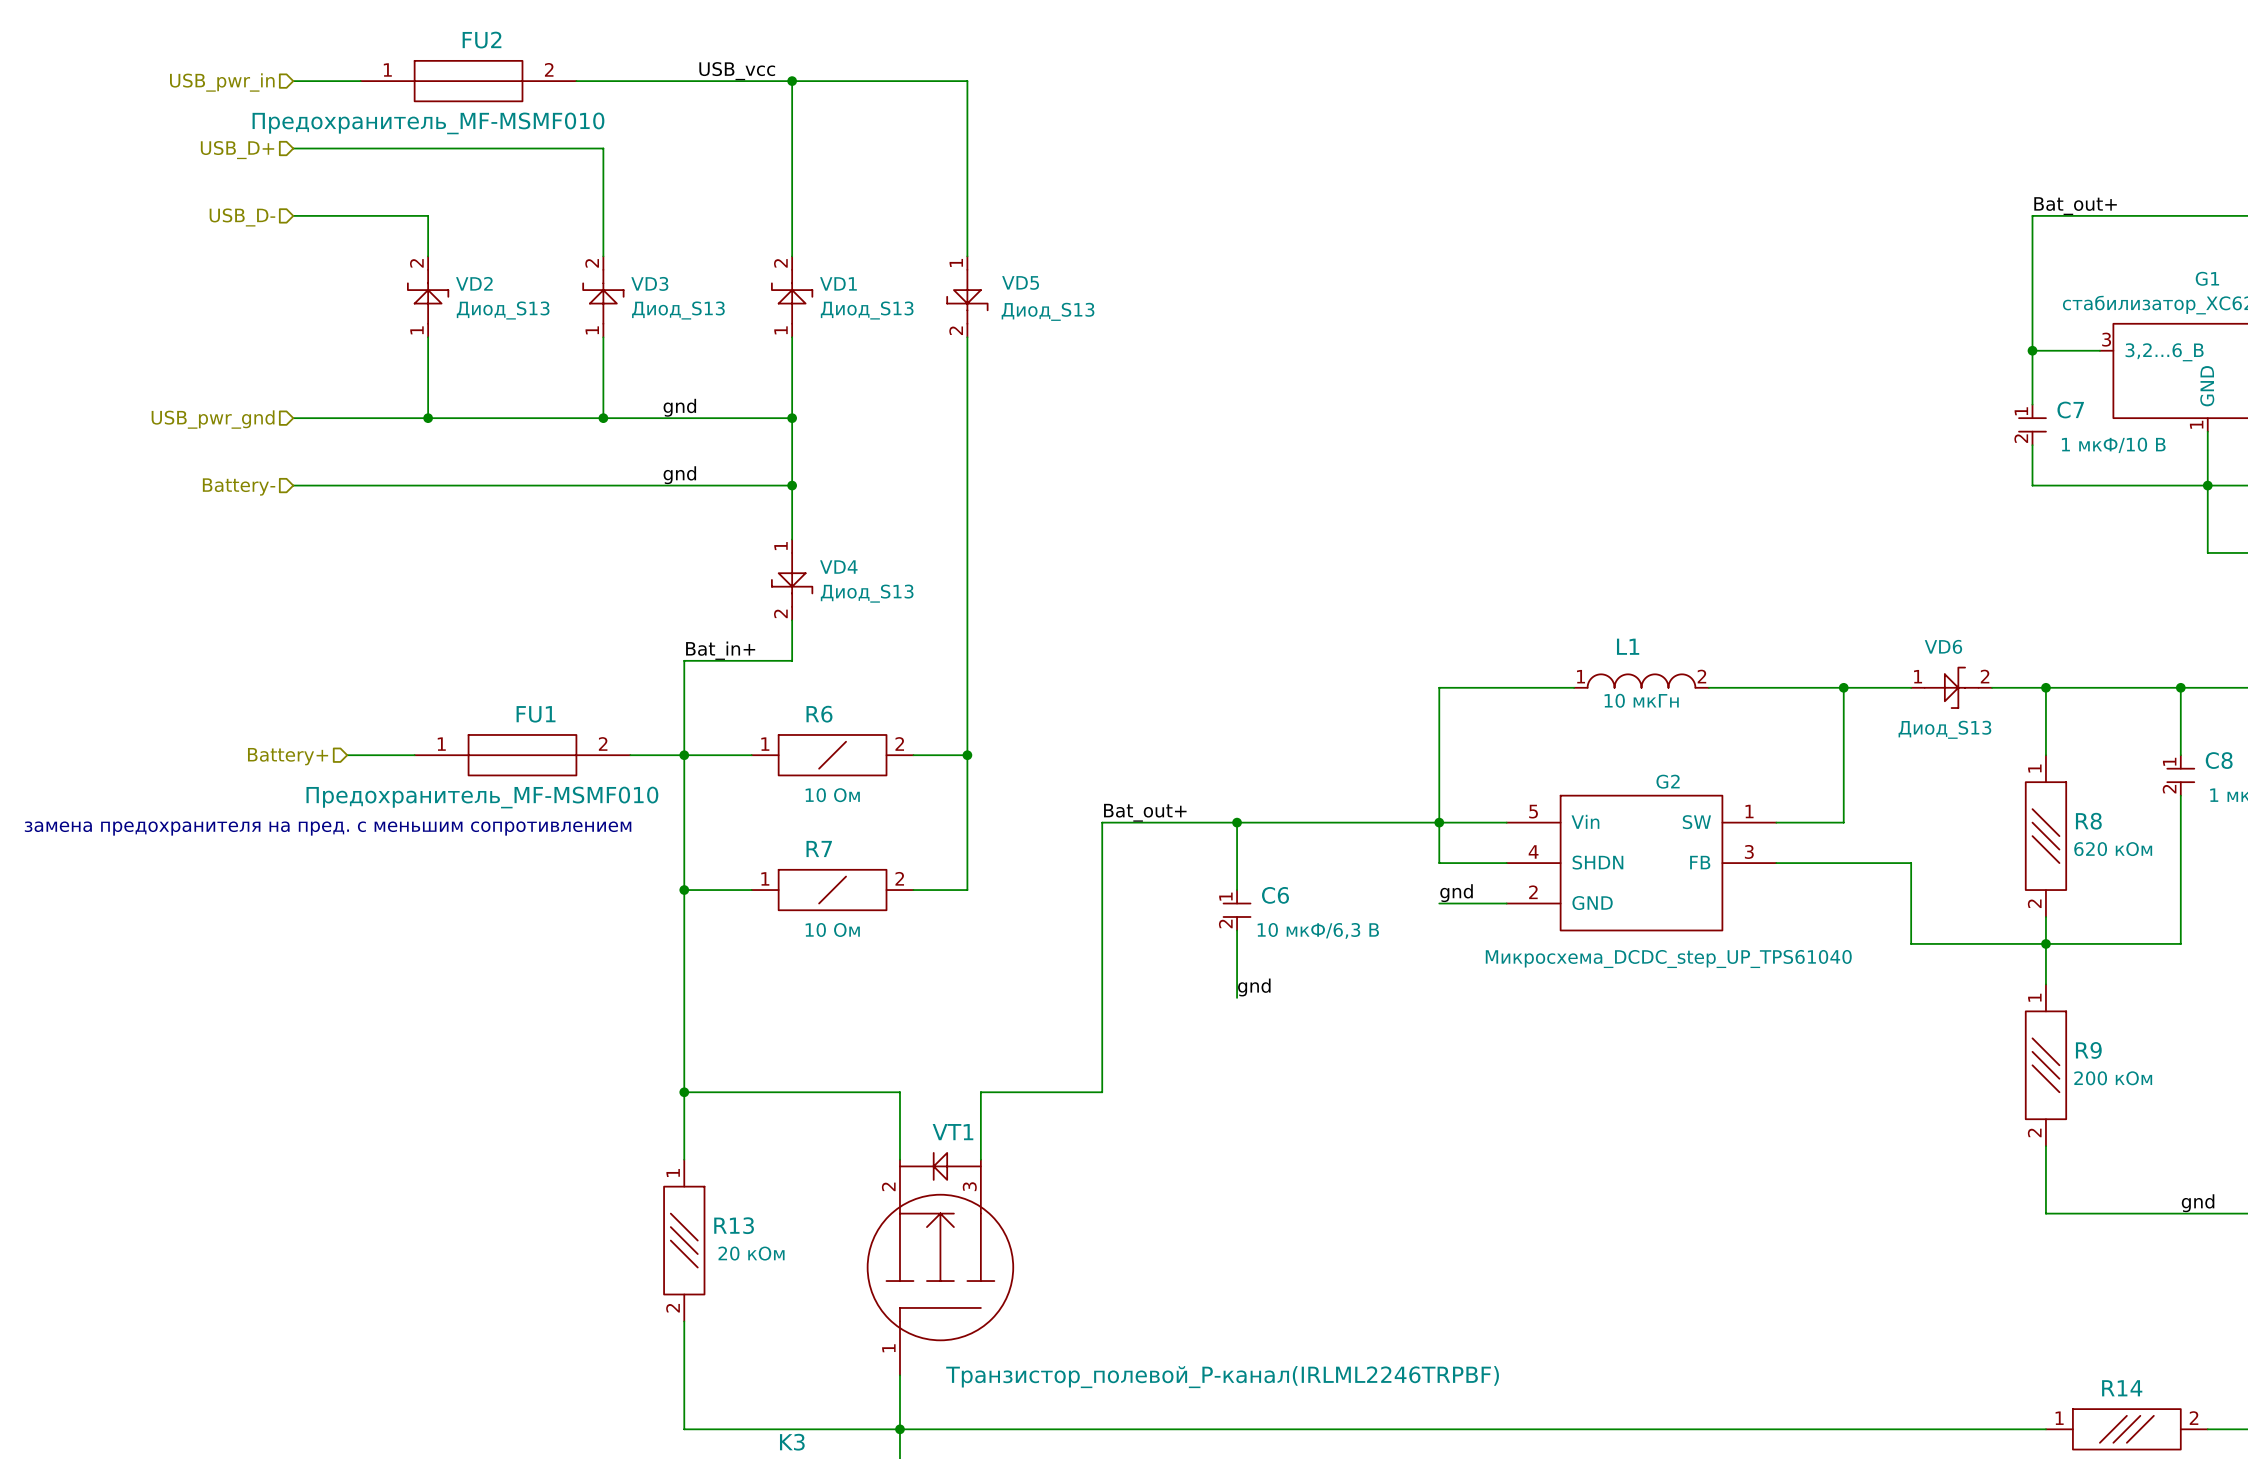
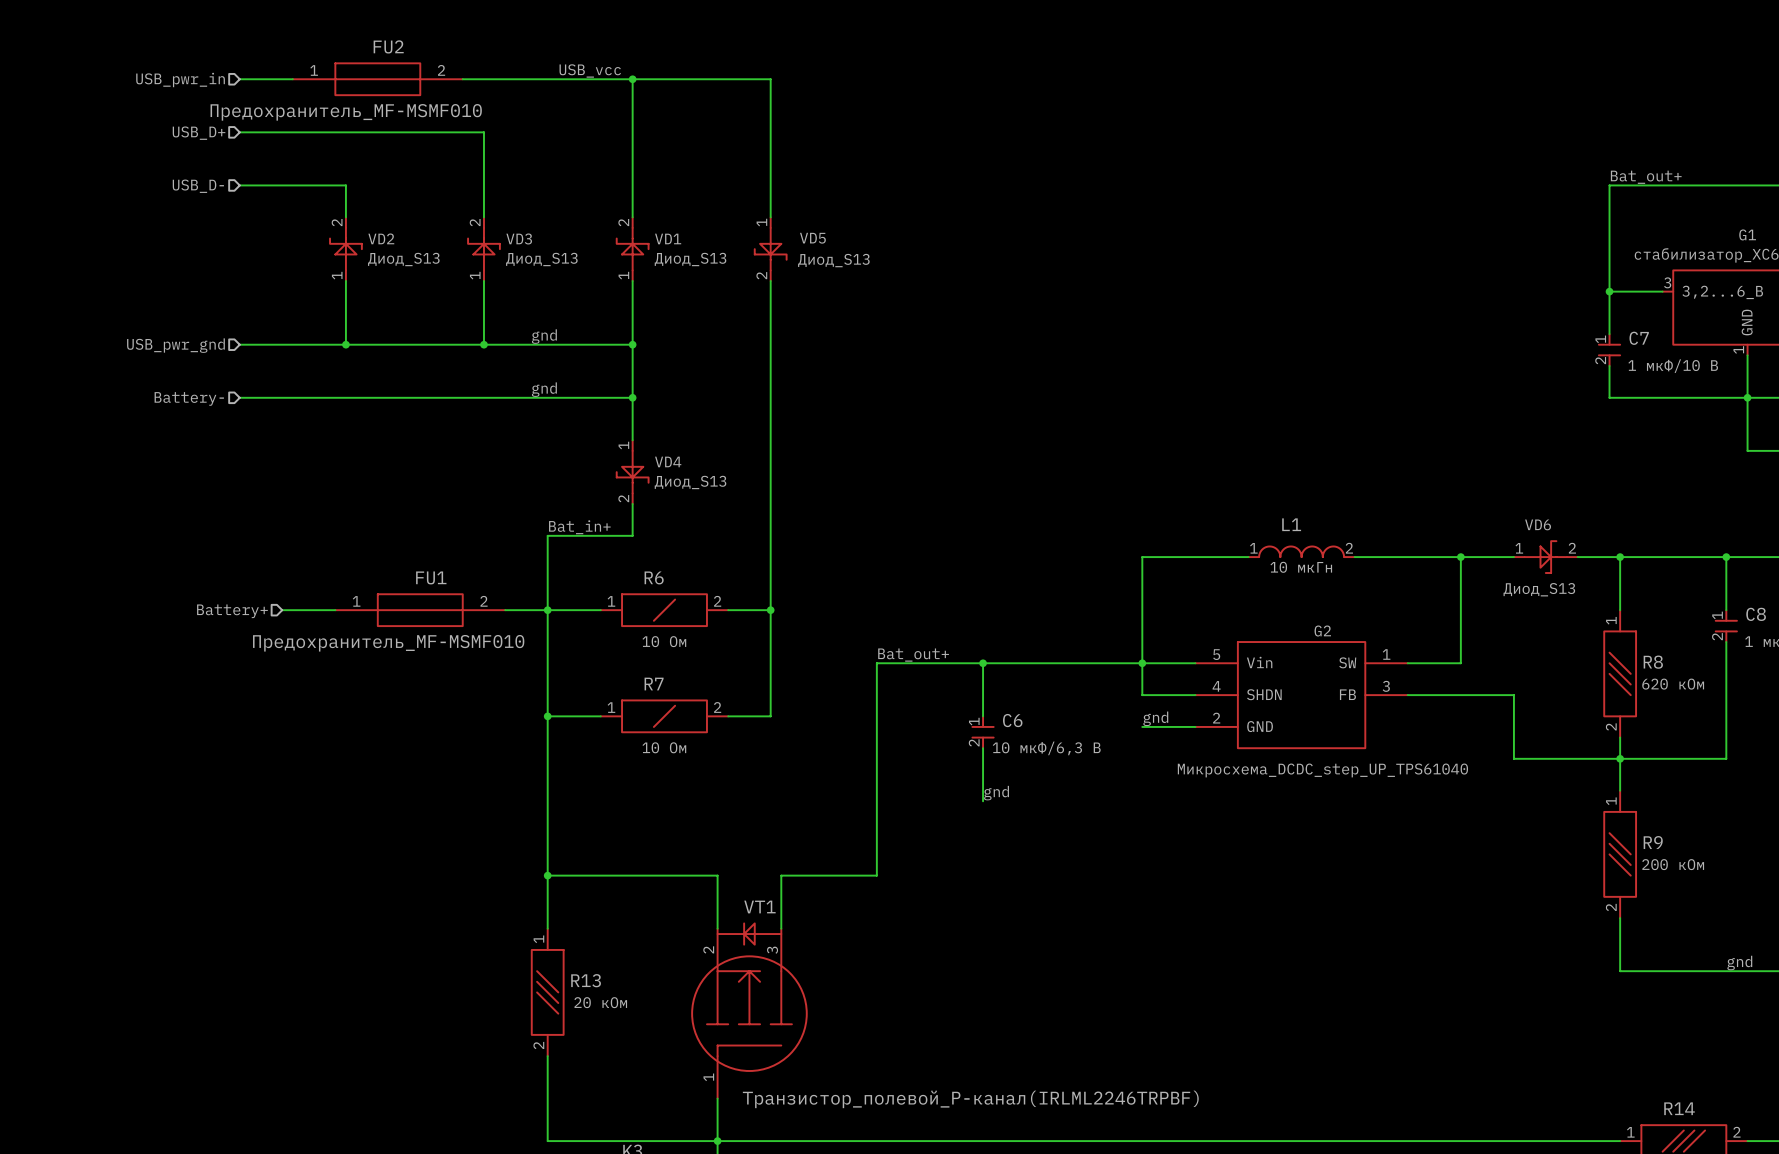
text: замена предохранителя на пред. с меньшим сопротивлением (328, 828) -> none

